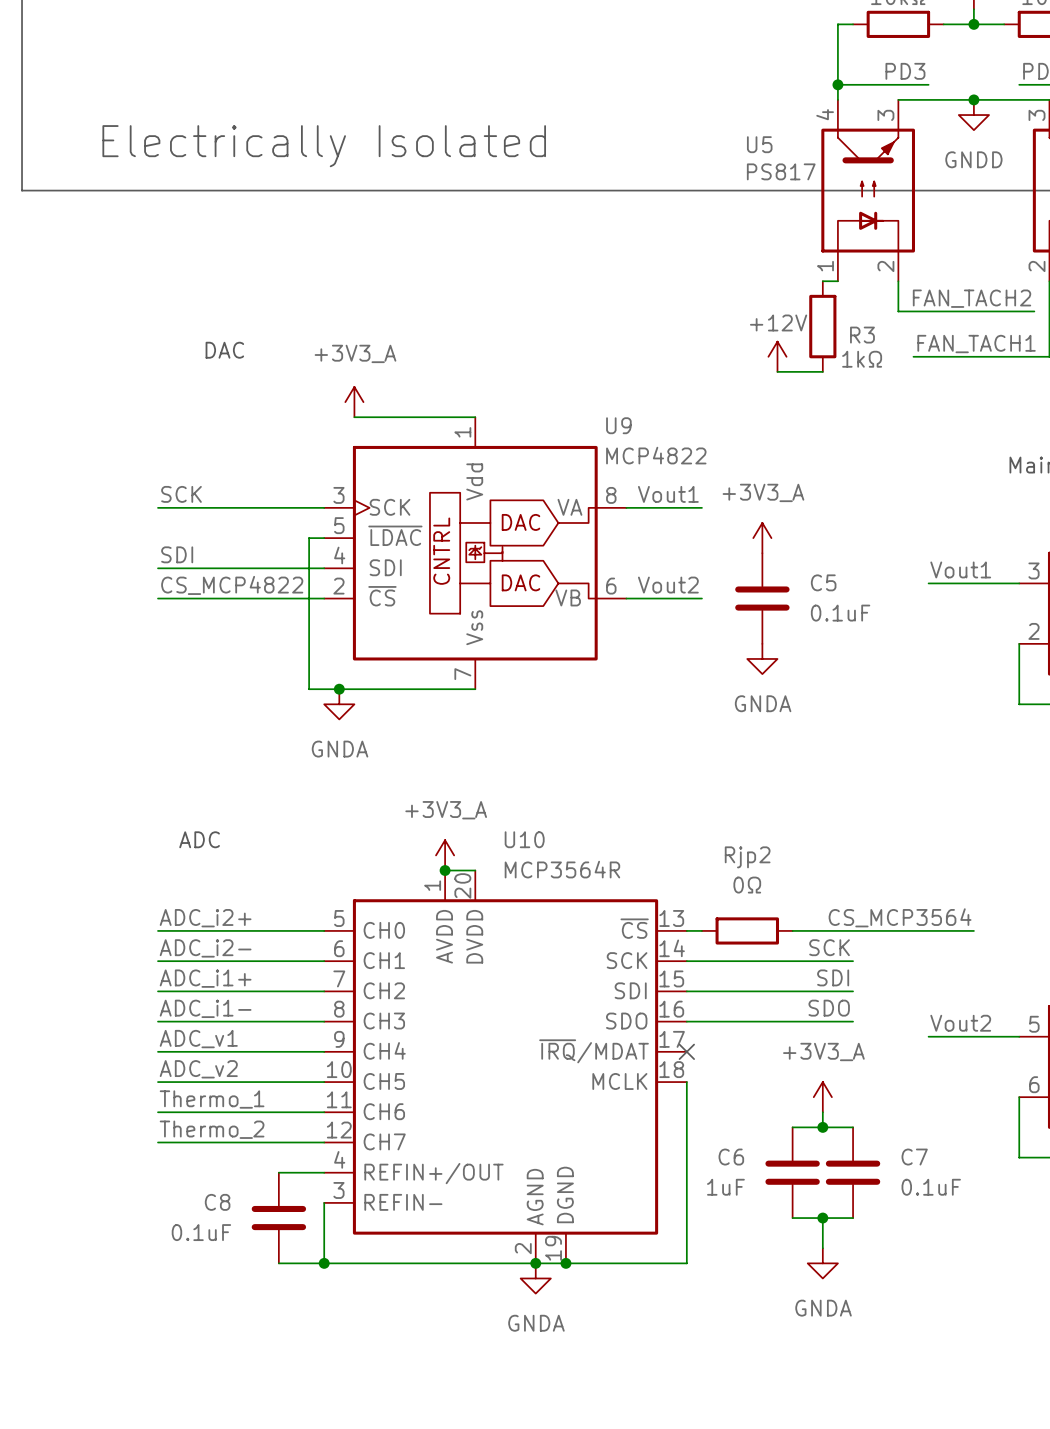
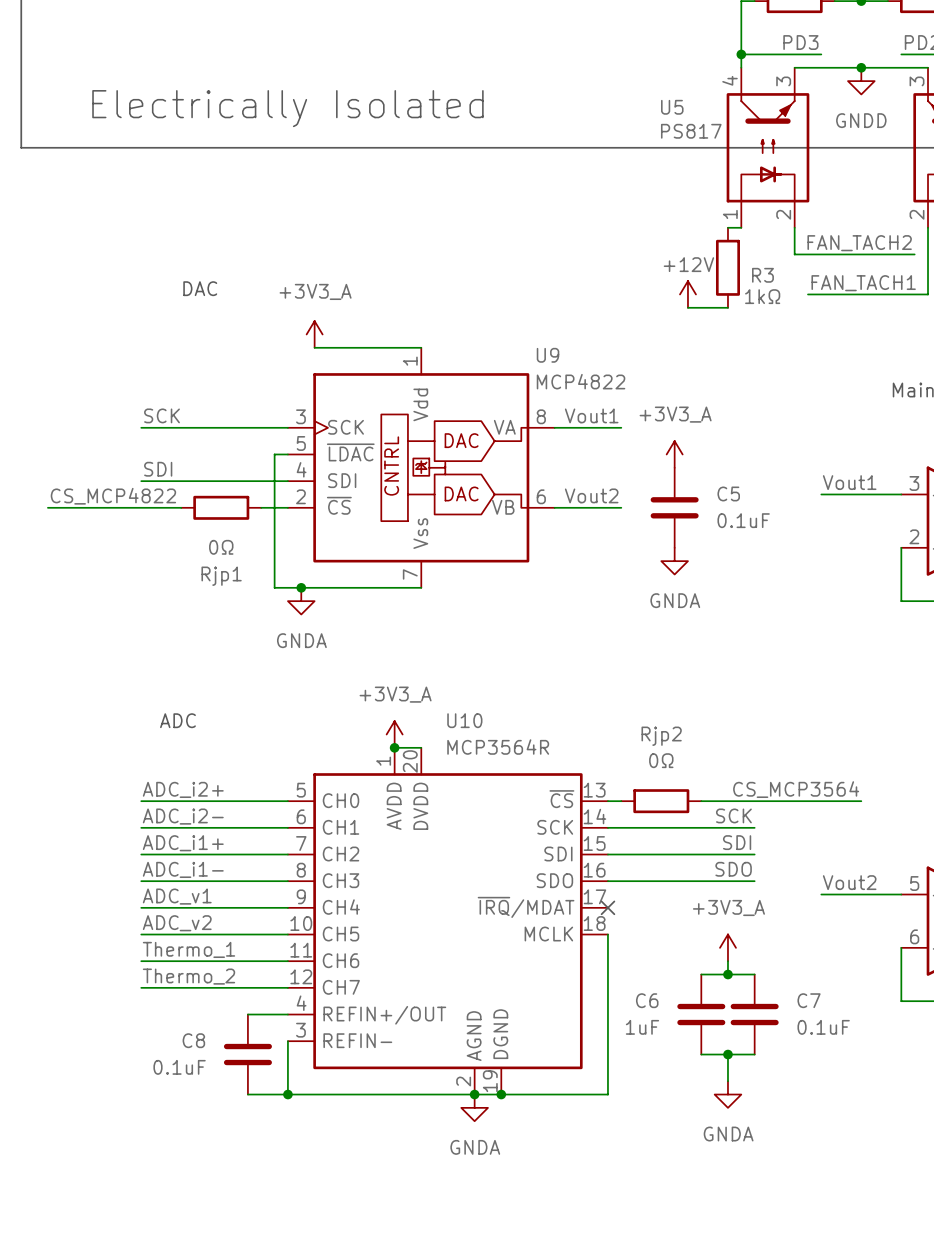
label position: CS_MCP4822 (232, 585) -> CS_MCP4822 (113, 496)
wire: none -> (47, 507) (141, 507)
wire: (203, 598) (293, 598) -> none
Rjp1: none -> 0Ω (221, 507)

